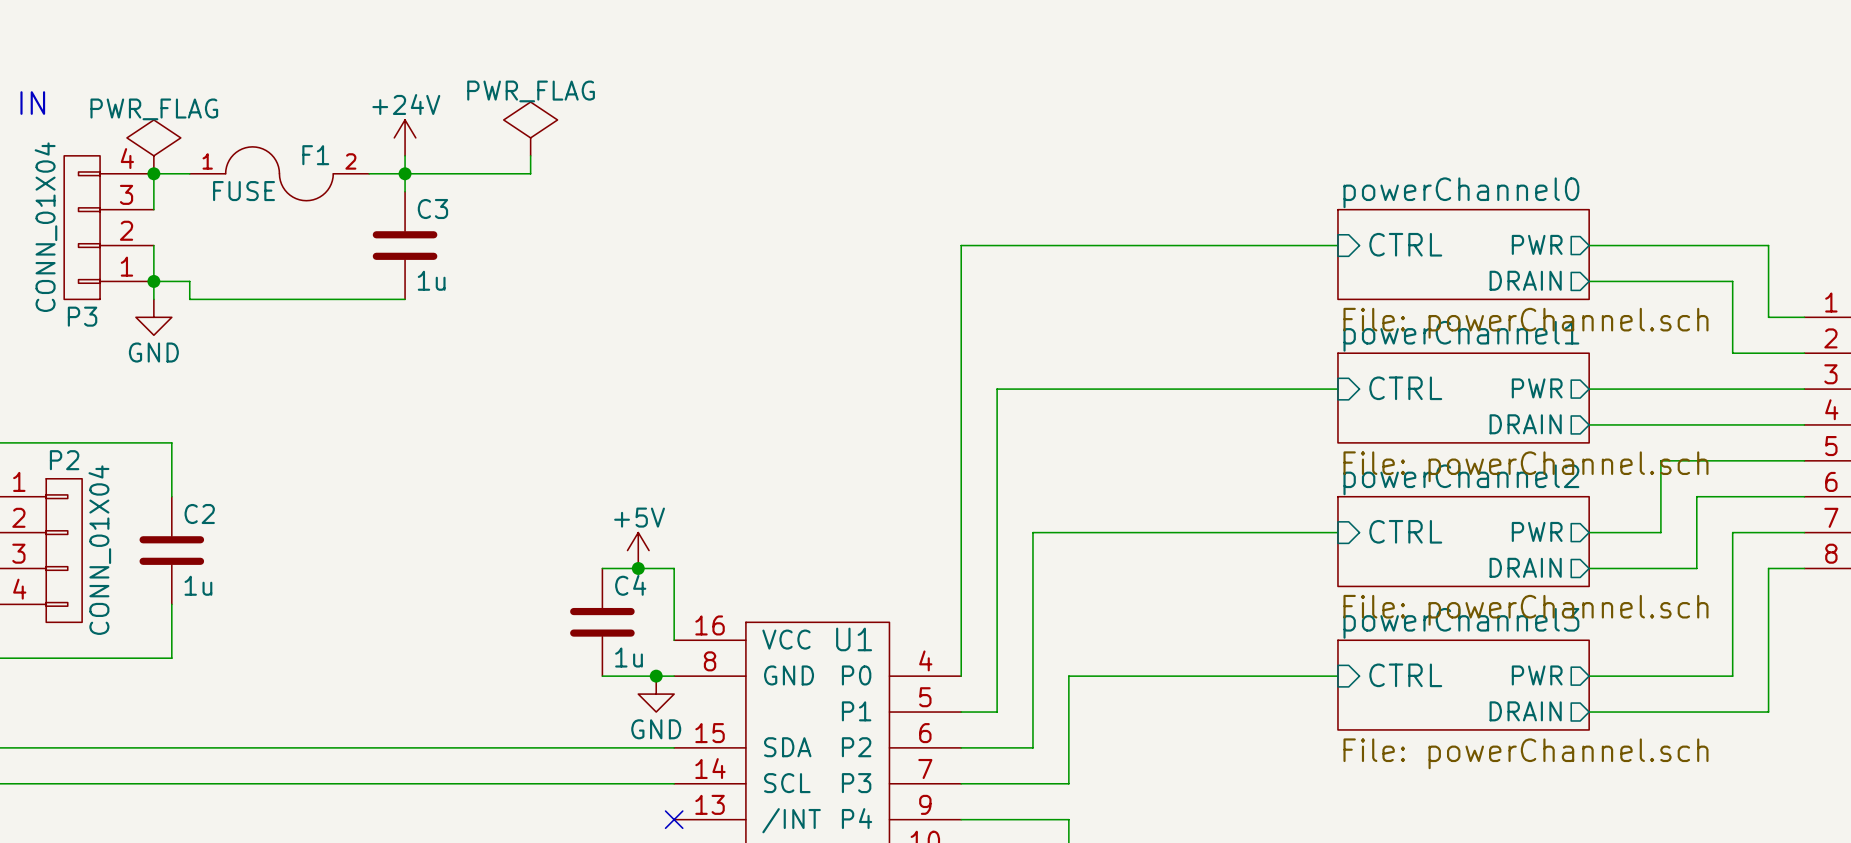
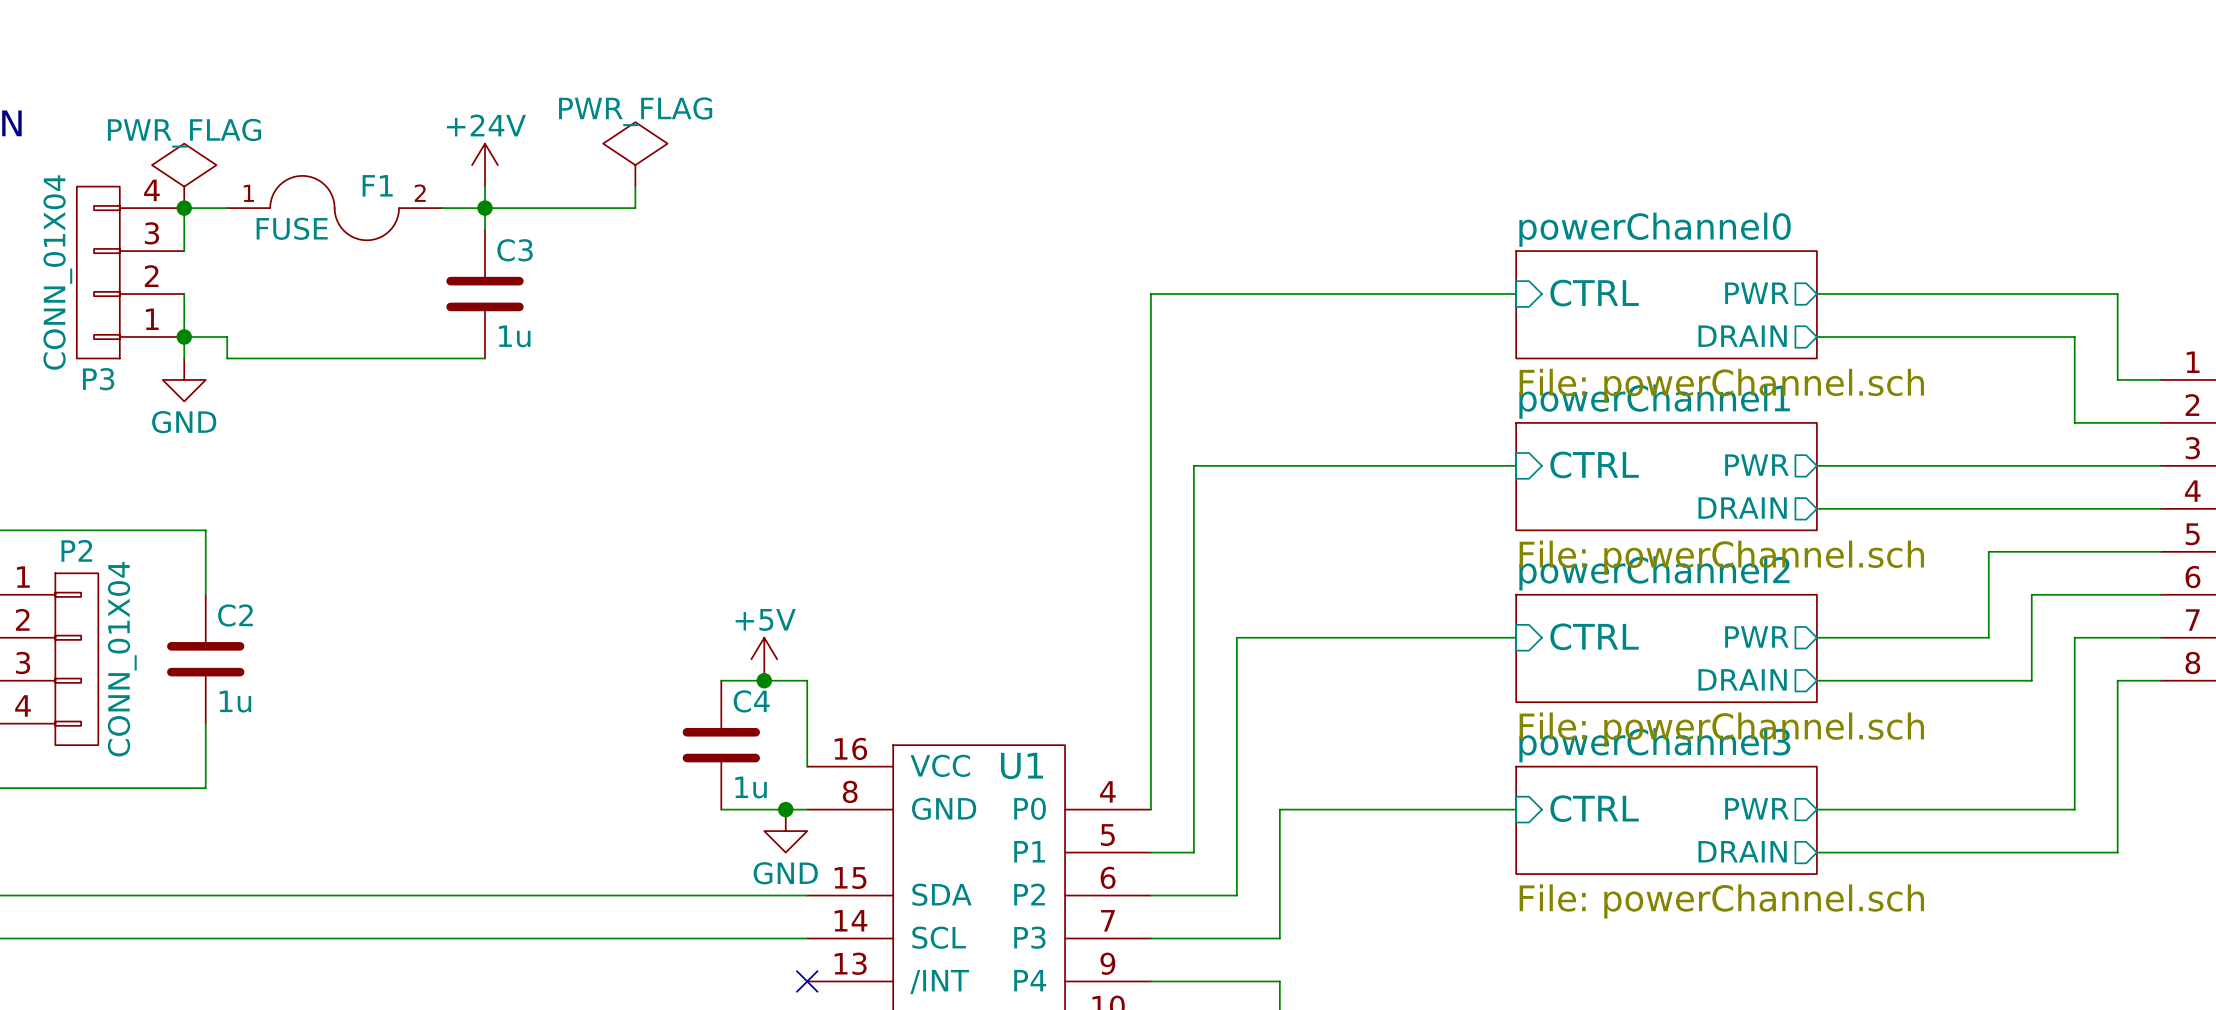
sheet pin position: CTRL (1405, 244) -> CTRL (1594, 293)
sheet pin position: PWR (1537, 244) -> PWR (1756, 293)
wire: (1266, 245) (1337, 245) -> (1816, 294) (1902, 294)
sheet powerChannel0 position: (1463, 254) -> (1666, 304)
sheet pin position: DRAIN (1525, 280) -> DRAIN (1742, 336)
wire: none -> (1816, 336) (1902, 336)
sheet pin position: CTRL (1405, 388) -> CTRL (1594, 464)
sheet pin position: PWR (1537, 388) -> PWR (1756, 465)
wire: (1266, 389) (1337, 389) -> (1816, 465) (1902, 465)
sheet powerChannel1 position: (1463, 398) -> (1666, 476)
wire: none -> (1816, 508) (1902, 508)
sheet pin position: DRAIN (1525, 424) -> DRAIN (1742, 508)
sheet pin position: CTRL (1405, 531) -> CTRL (1594, 636)
sheet pin position: PWR (1537, 531) -> PWR (1756, 636)
wire: (1266, 532) (1337, 532) -> (1816, 637) (1902, 637)
sheet powerChannel2 position: (1463, 541) -> (1666, 648)
sheet pin position: DRAIN (1525, 567) -> DRAIN (1742, 679)
wire: none -> (1816, 680) (1902, 680)
sheet pin position: CTRL (1405, 675) -> CTRL (1594, 808)
sheet pin position: PWR (1537, 675) -> PWR (1756, 808)
wire: (1266, 676) (1337, 676) -> (1816, 809) (1902, 809)
sheet powerChannel3 position: (1463, 685) -> (1666, 820)
sheet pin position: DRAIN (1525, 711) -> DRAIN (1742, 851)
wire: none -> (1816, 852) (1902, 852)

